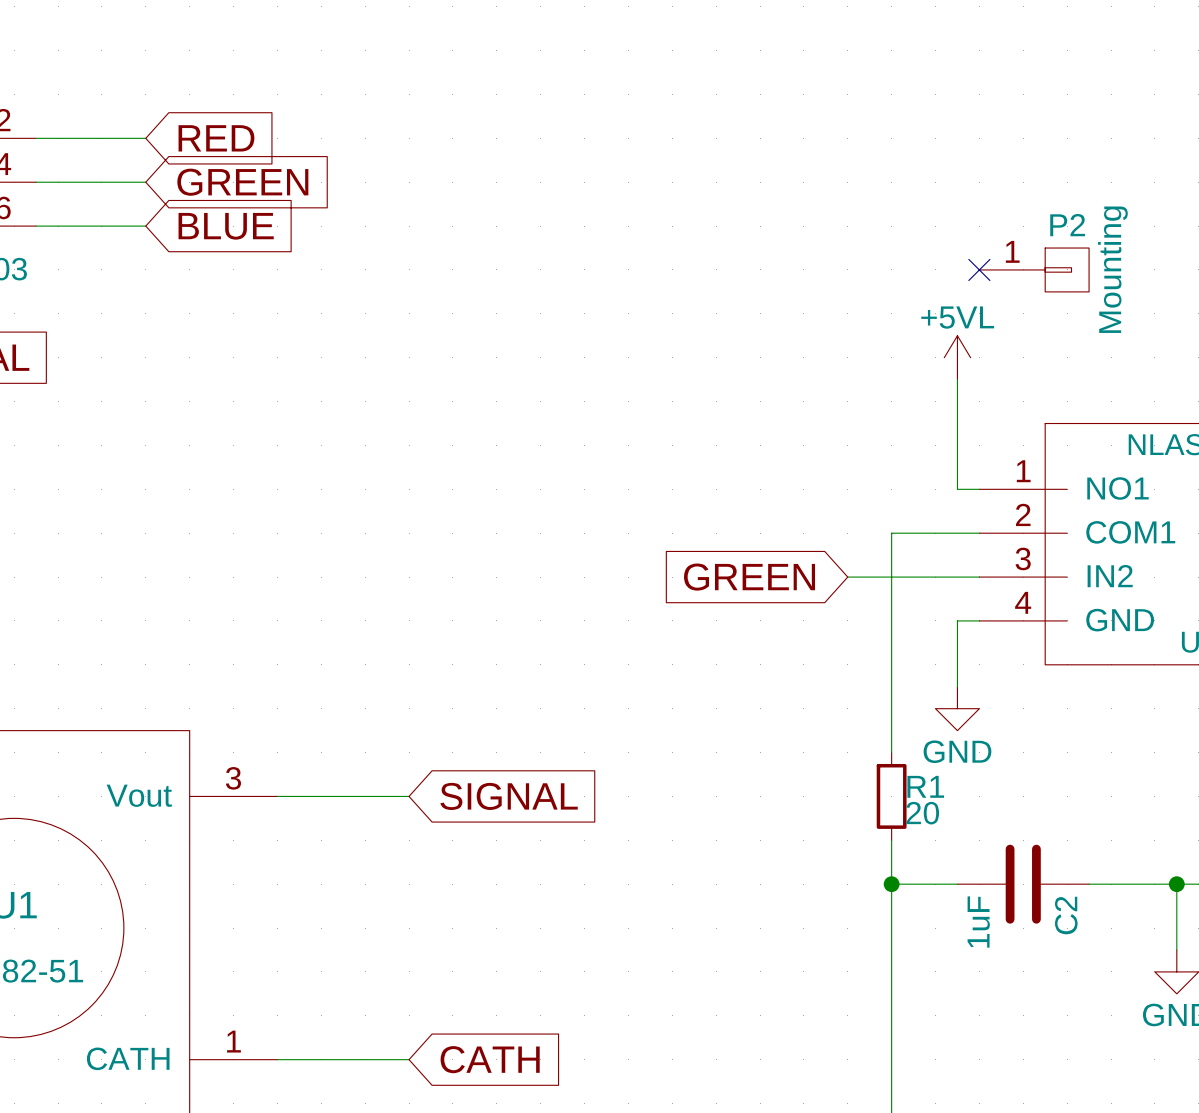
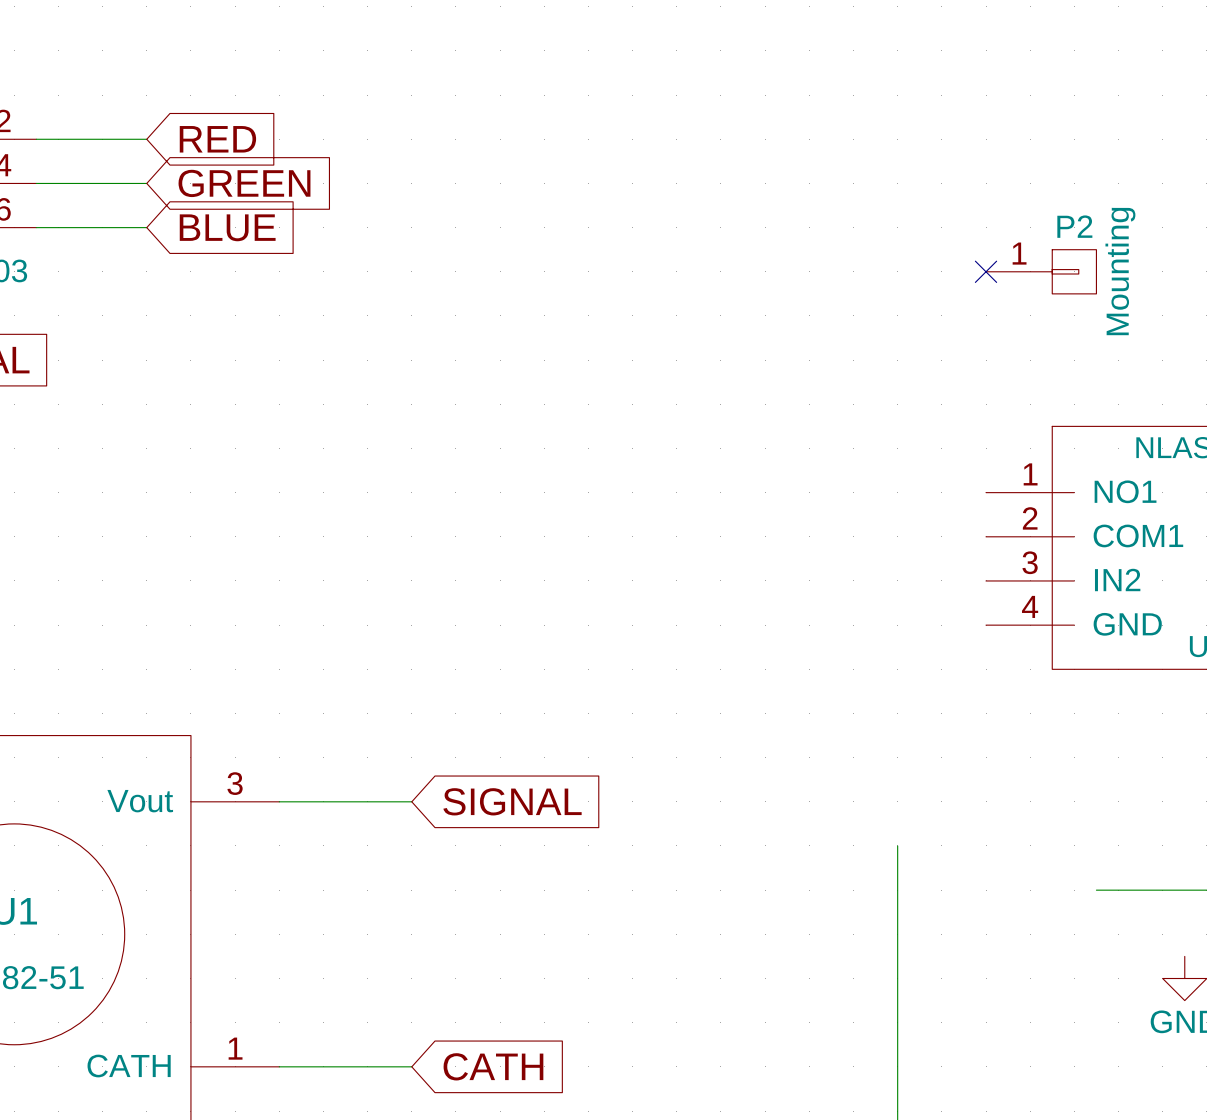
power symbol: +5VL (957, 357) -> none
wire: (957, 379) (957, 489) (979, 489) -> none
wire: (979, 533) (891, 533) (891, 752) -> none
global label: GREEN (749, 577) -> none
wire: (847, 577) (979, 577) -> none
wire: (979, 620) (957, 620) (957, 686) -> none
power symbol: GND (957, 708) -> none
R1: 20 (891, 796) -> none
wire: (891, 884) (957, 884) -> none
junction: (891, 884) -> none
C2: 1uF (1023, 884) -> none
wire: (1176, 884) (1176, 949) -> none
junction: (1176, 884) -> none

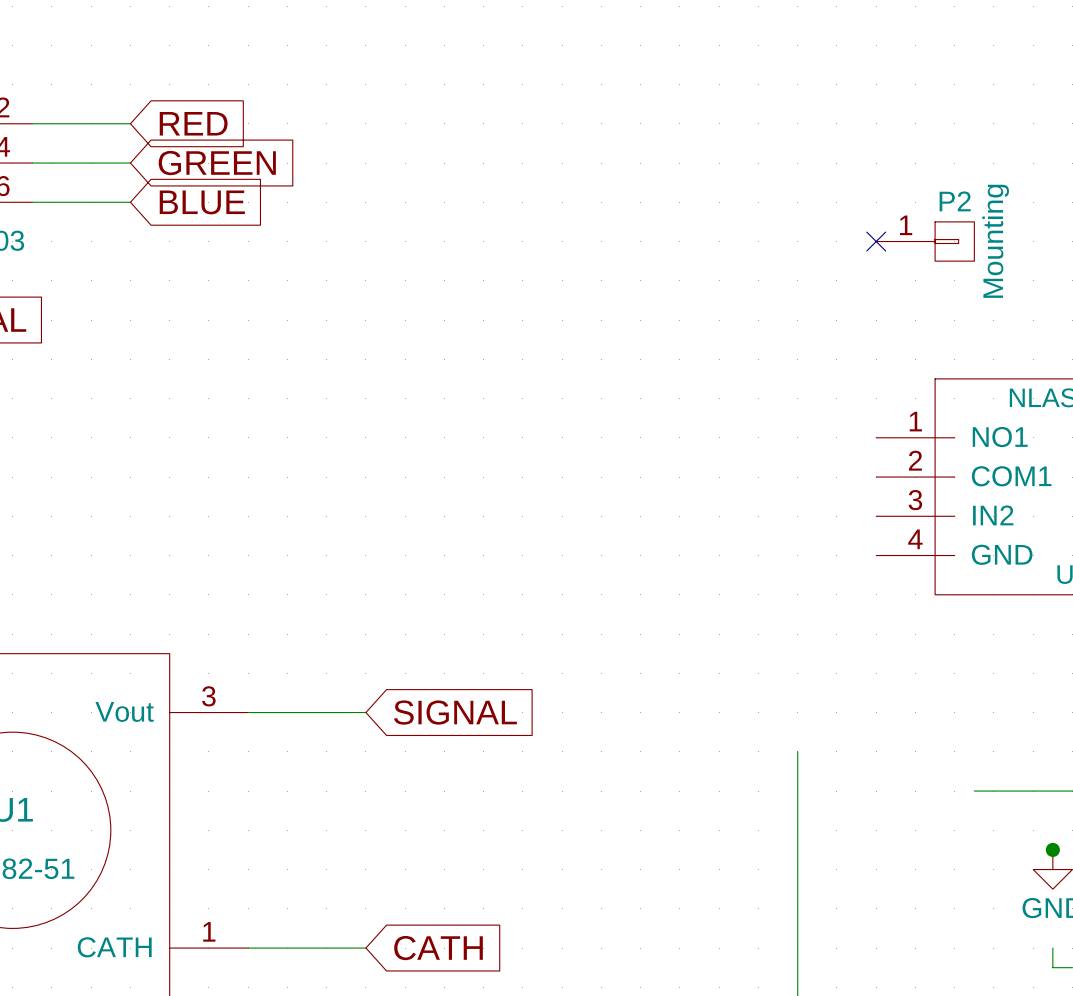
junction: none -> (1052, 849)
wire: none -> (1052, 948) (1052, 967) (1072, 967)

